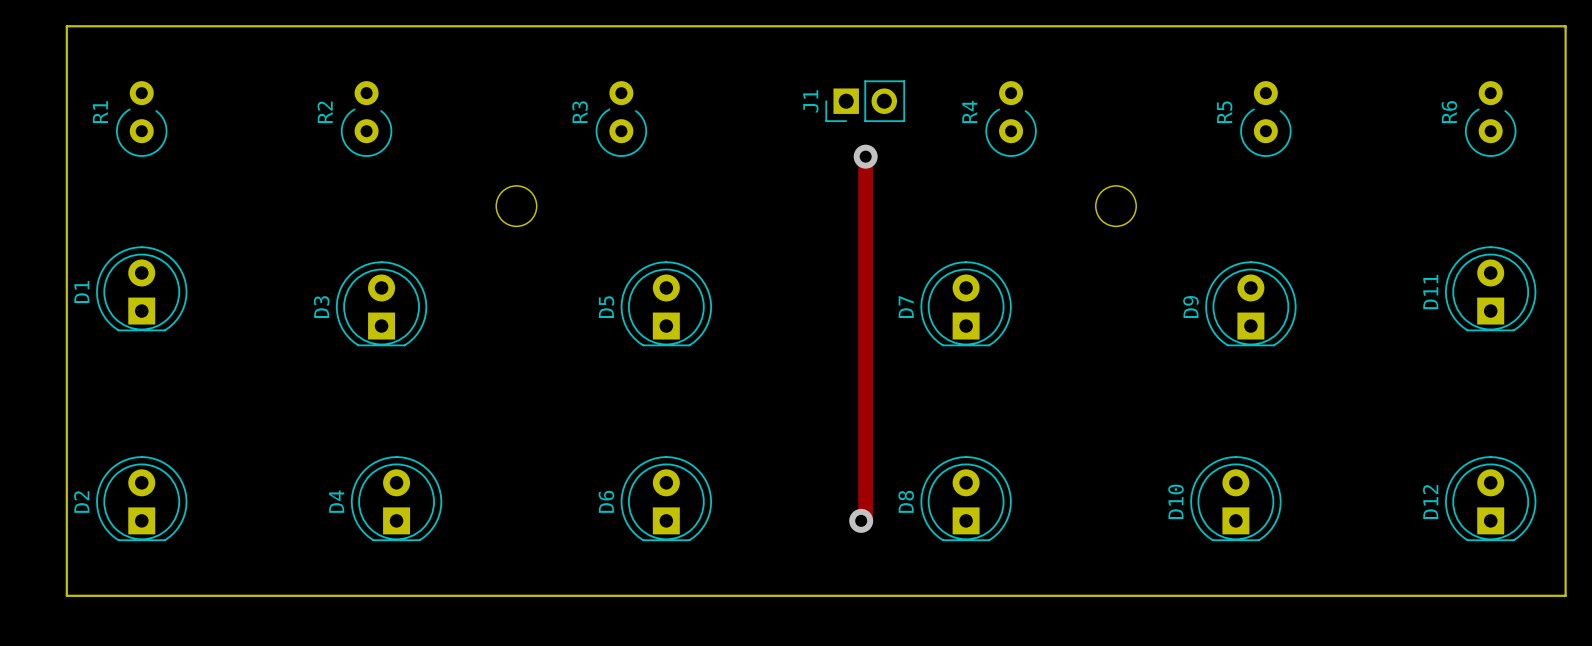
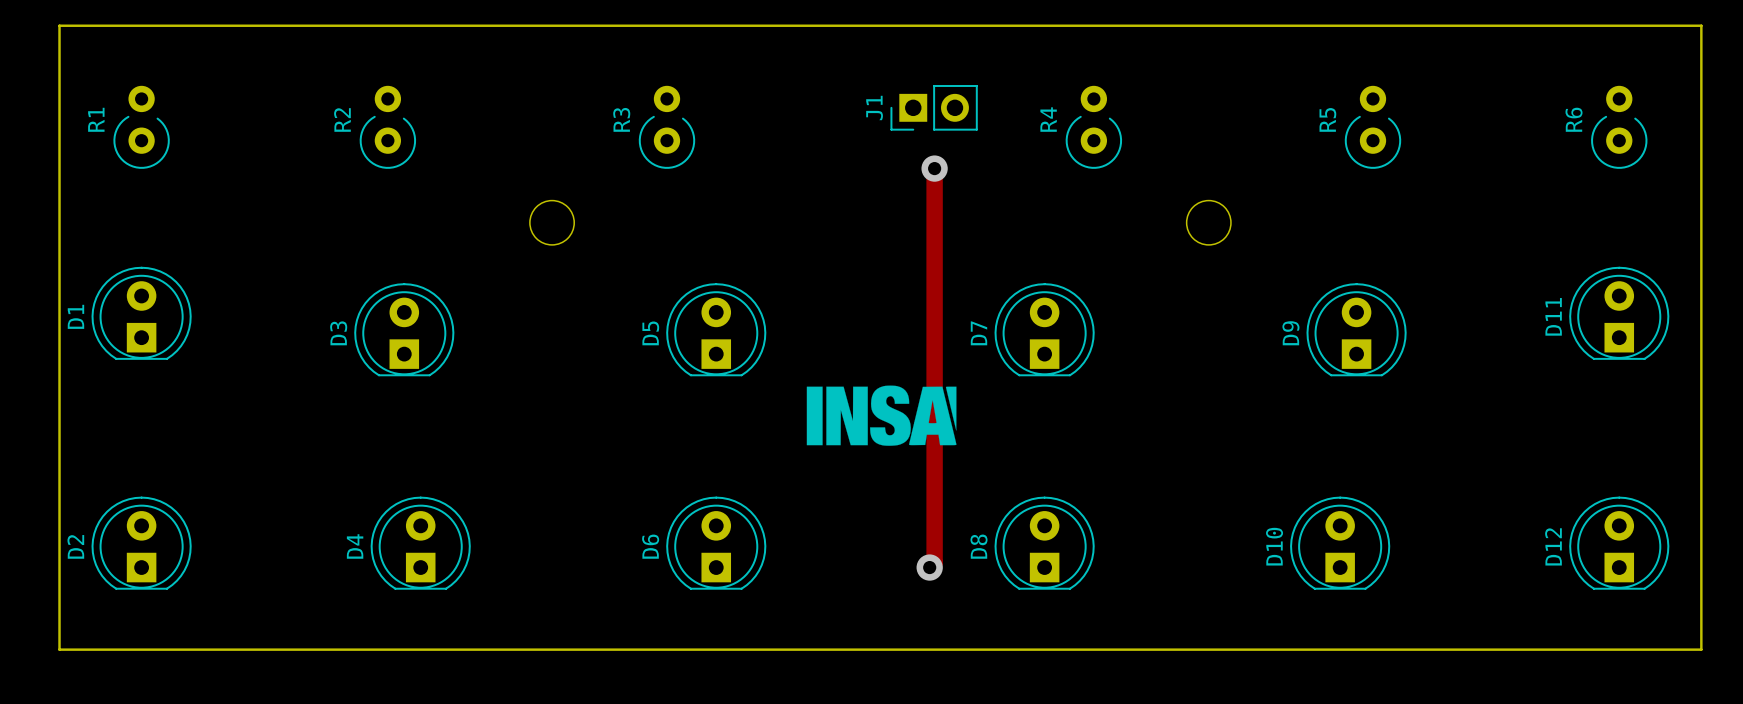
drawing: none -> [806, 385, 957, 446]

